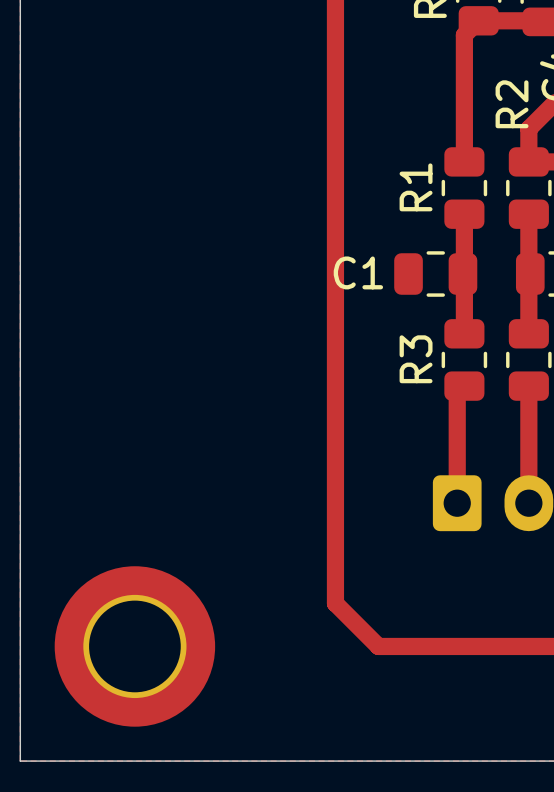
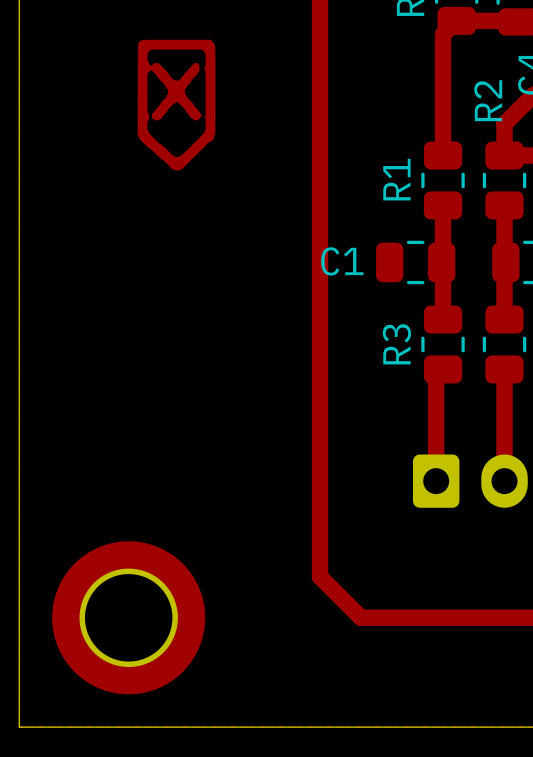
drawing: none -> [137, 39, 216, 171]

